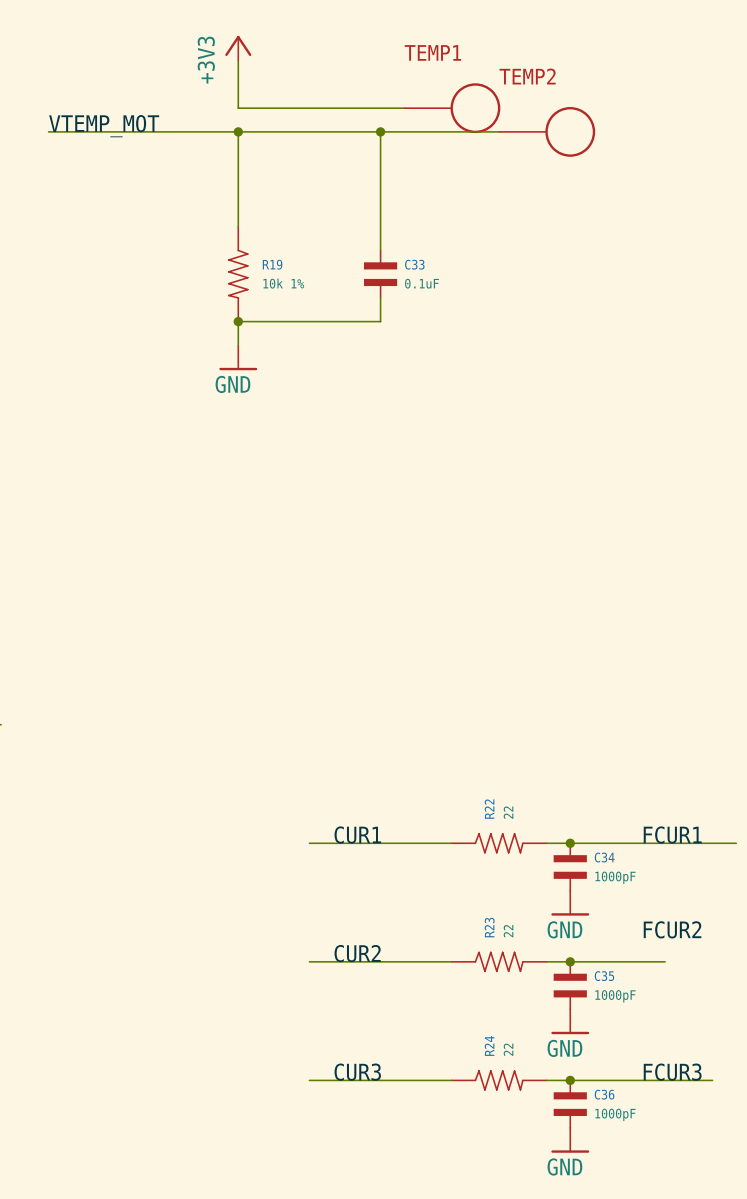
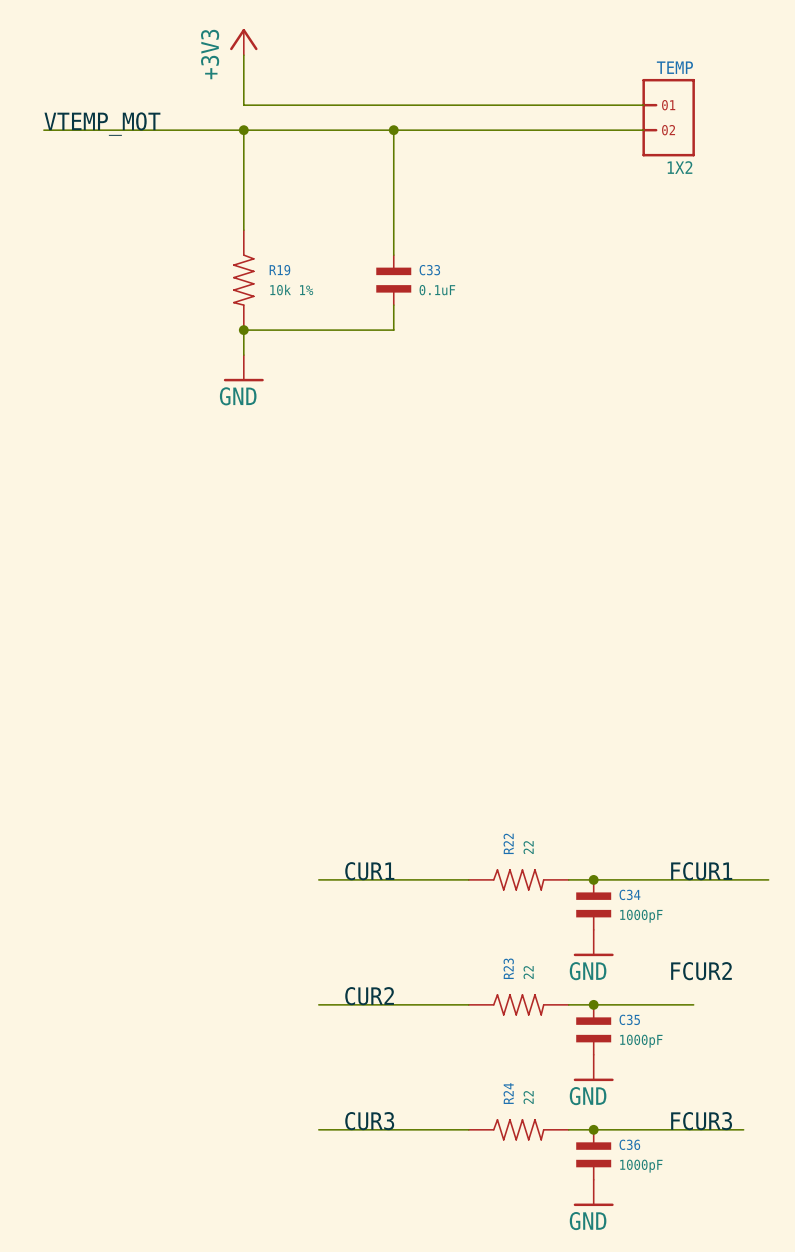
wire: none -> (418, 105) (643, 105)
TEMP1: (452, 108) -> none
TEMP: none -> 1X2 (668, 117)
wire: none -> (518, 130) (643, 130)
TEMP2: (547, 131) -> none

